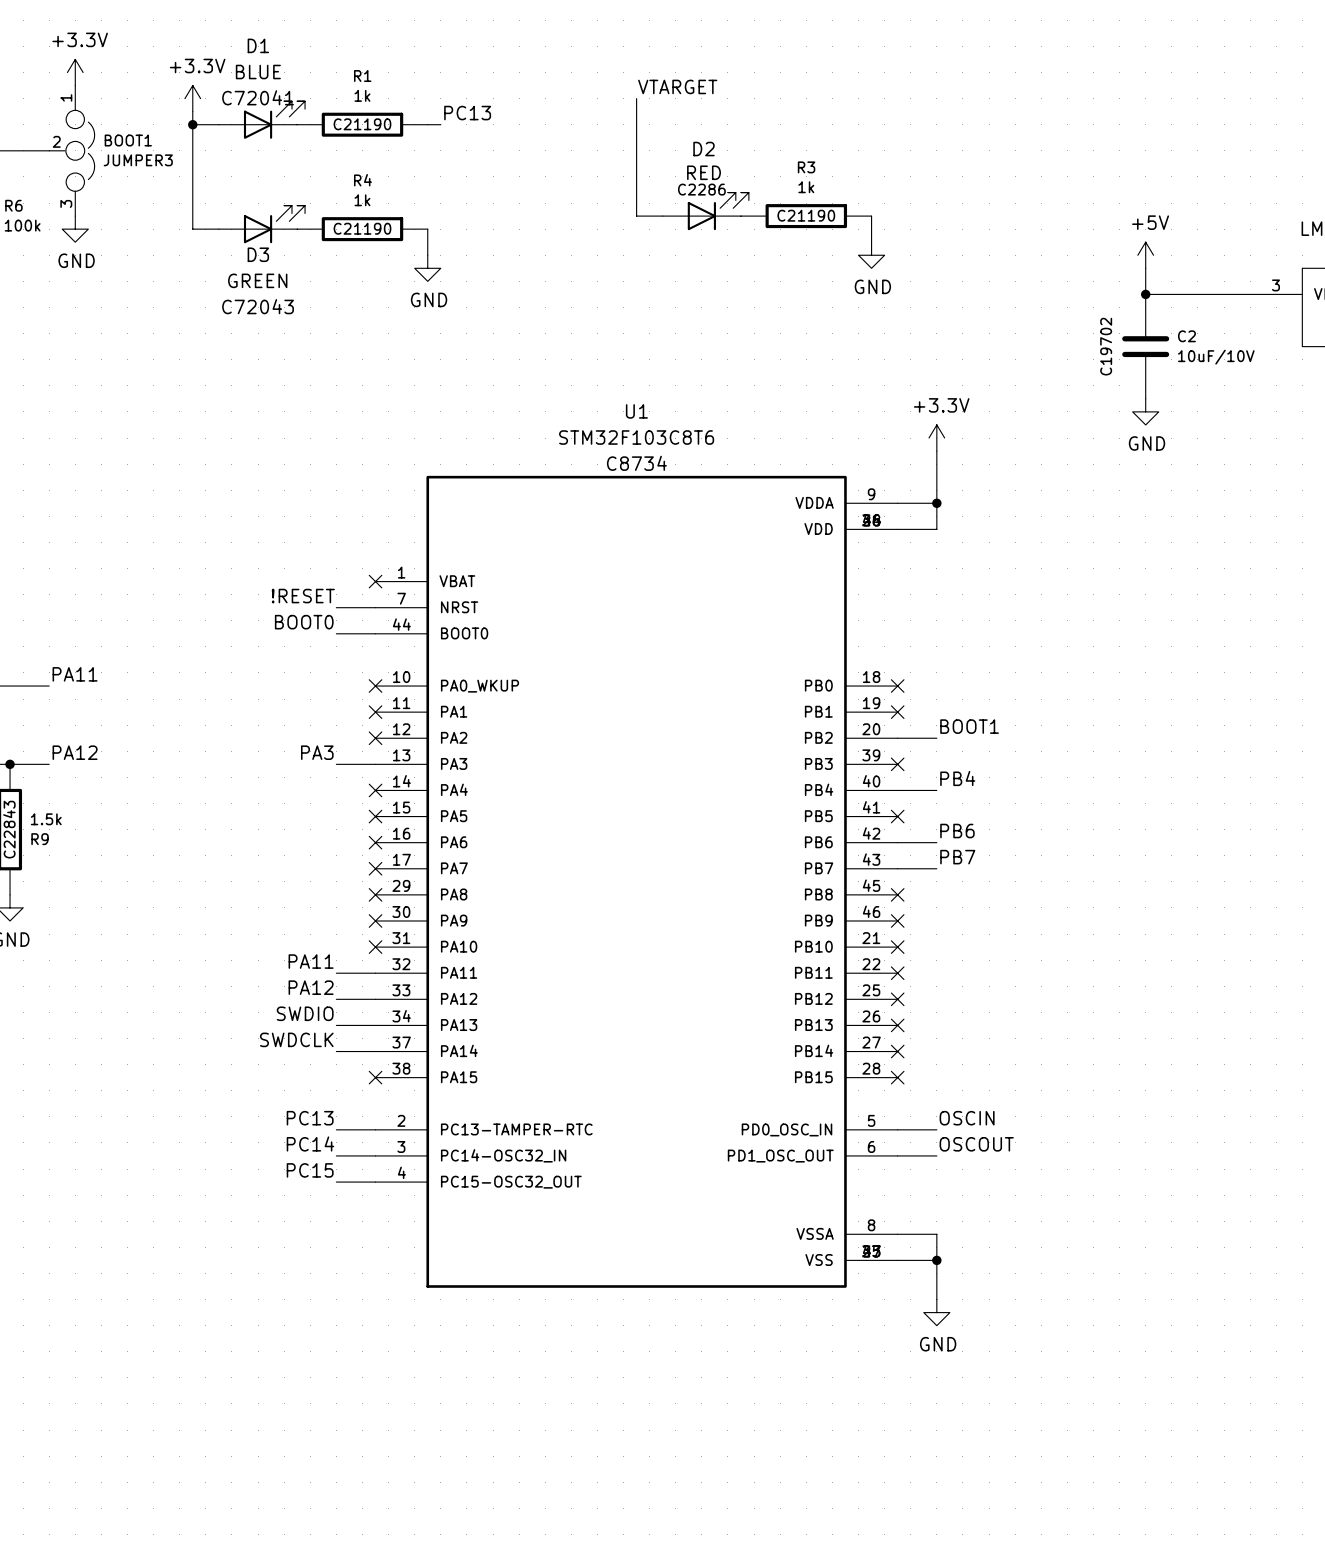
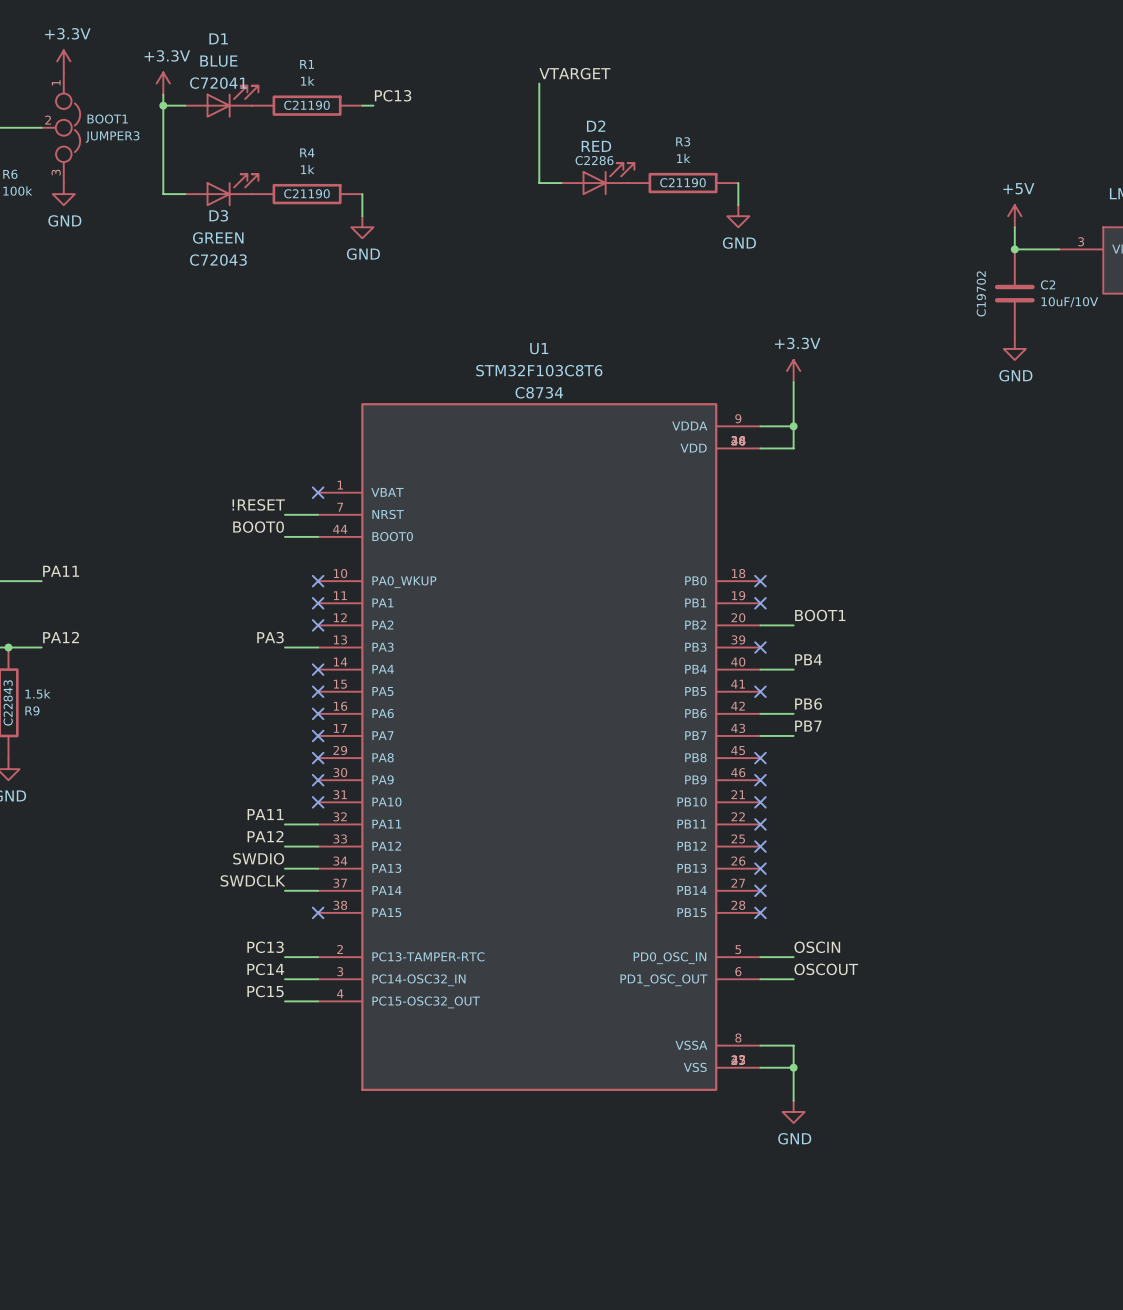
power symbol position: +5V (1145, 255) -> +5V (1014, 216)
wire: (1145, 268) (1145, 294) (1197, 294) -> (1014, 227) (1014, 249)
junction position: (1145, 294) -> (1014, 249)
C2 position: (1145, 346) -> (1014, 293)
power symbol position: GND (1145, 411) -> GND (1014, 348)

